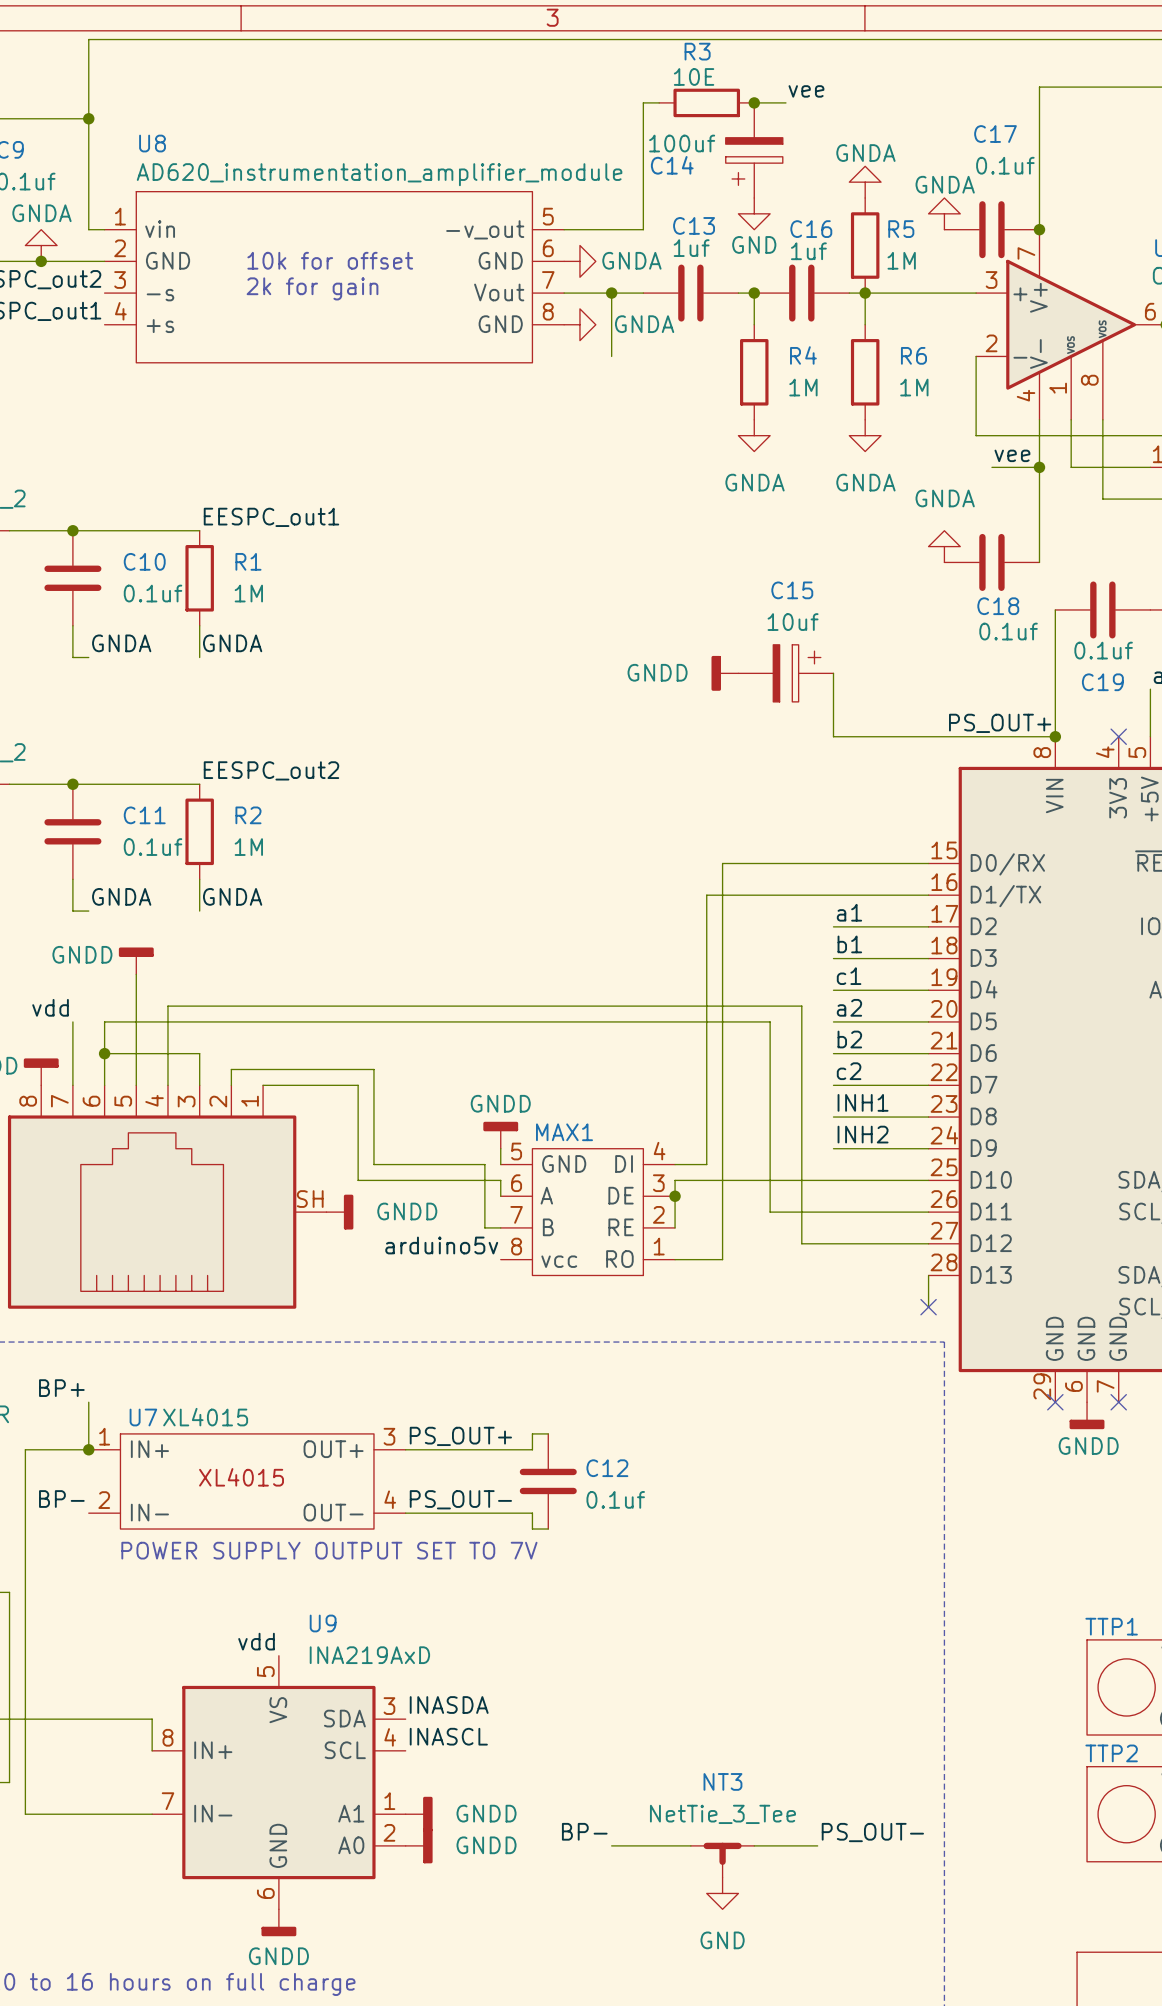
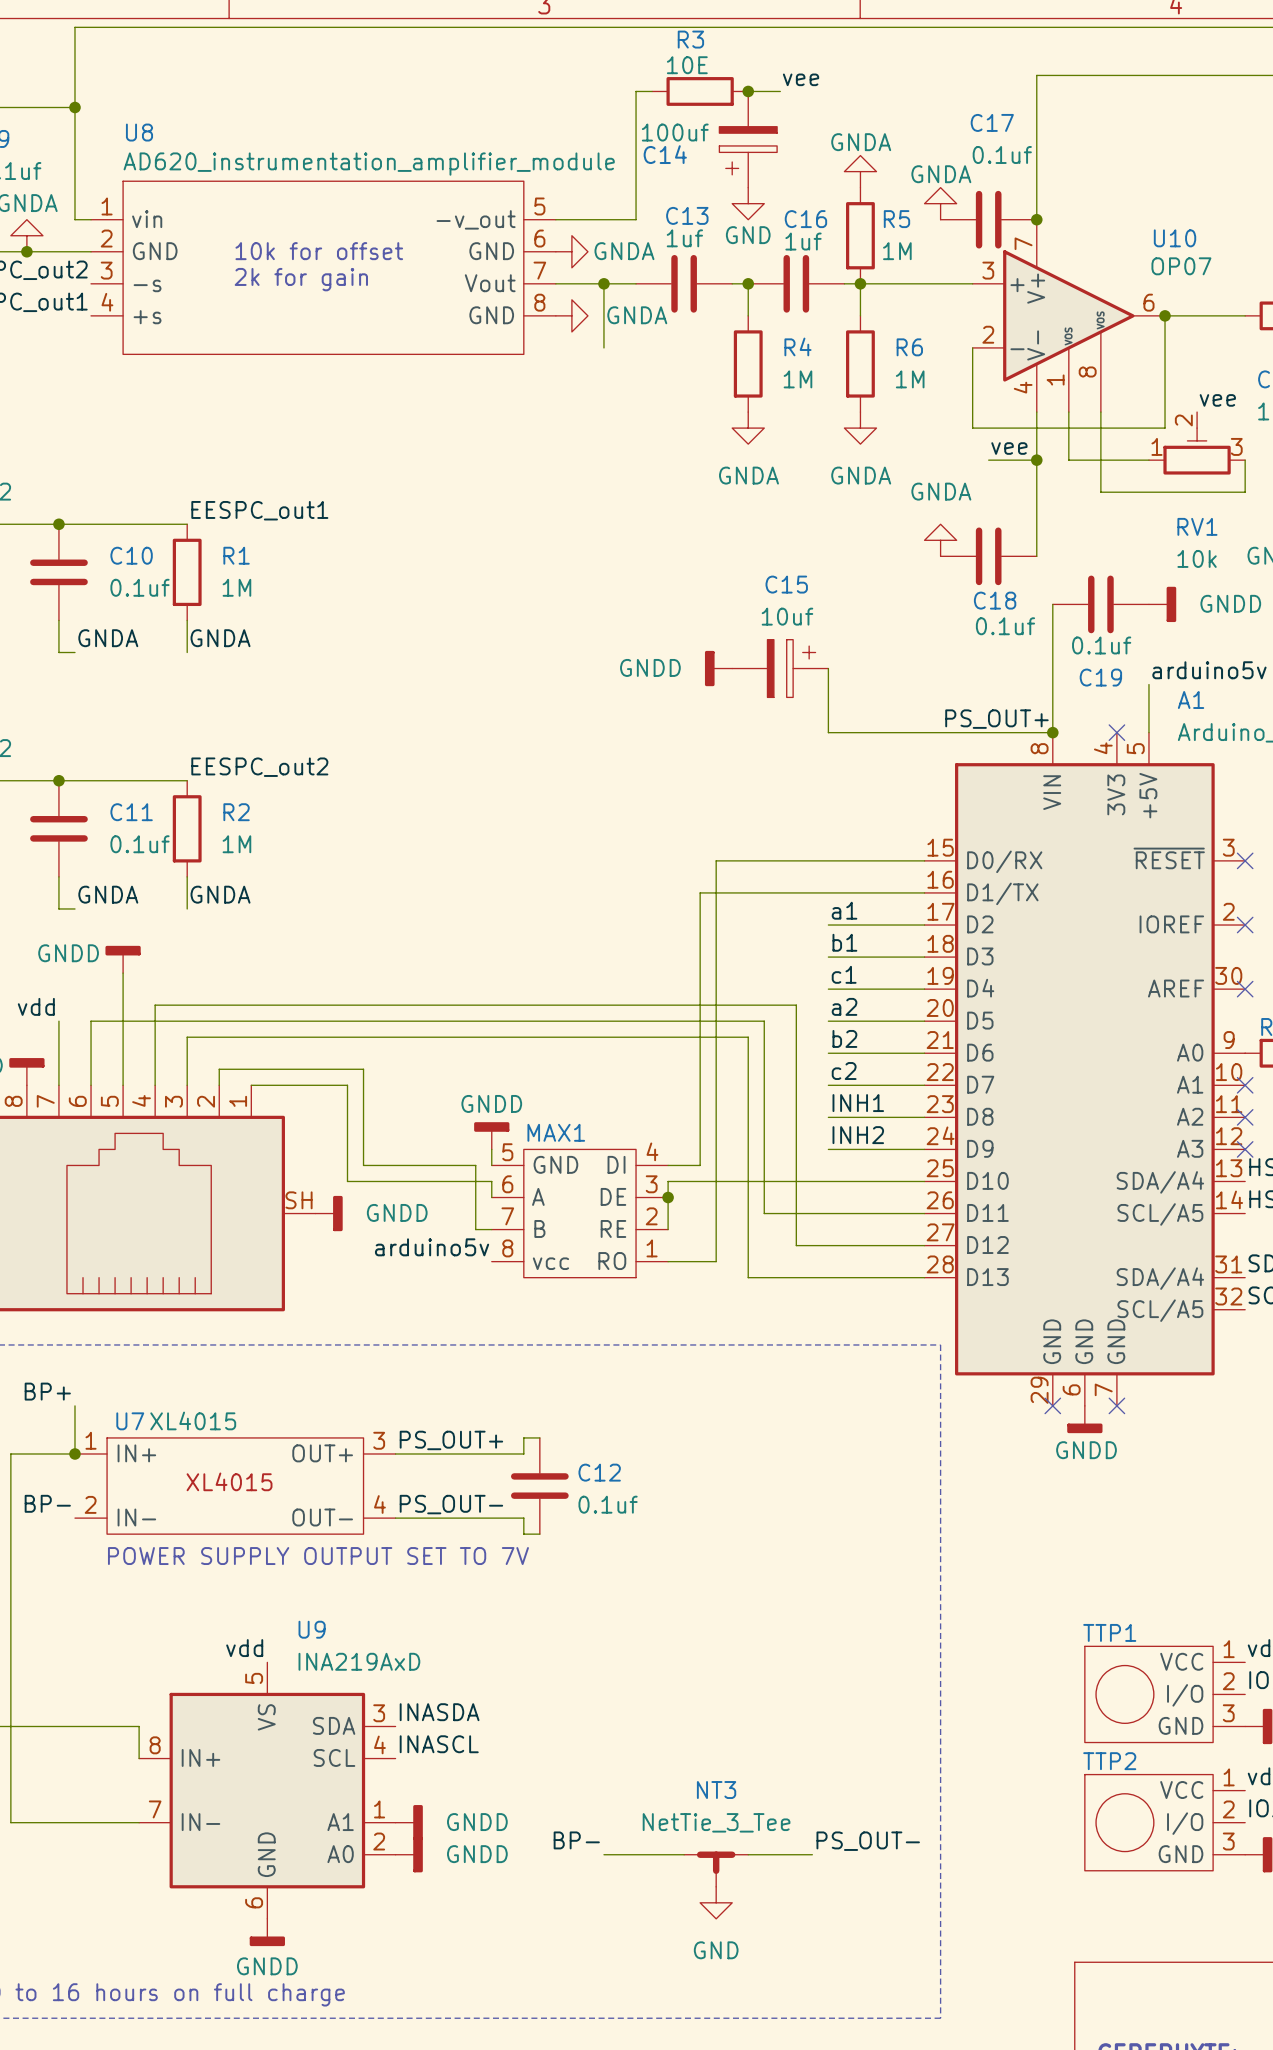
wire: (104, 1053) (199, 1053) -> none
junction: (104, 1053) -> none
wire: (928, 1275) (928, 1307) -> (924, 1277) (748, 1277) (748, 1037) (187, 1037) (187, 1053)
no-connect mark: (928, 1307) -> none

